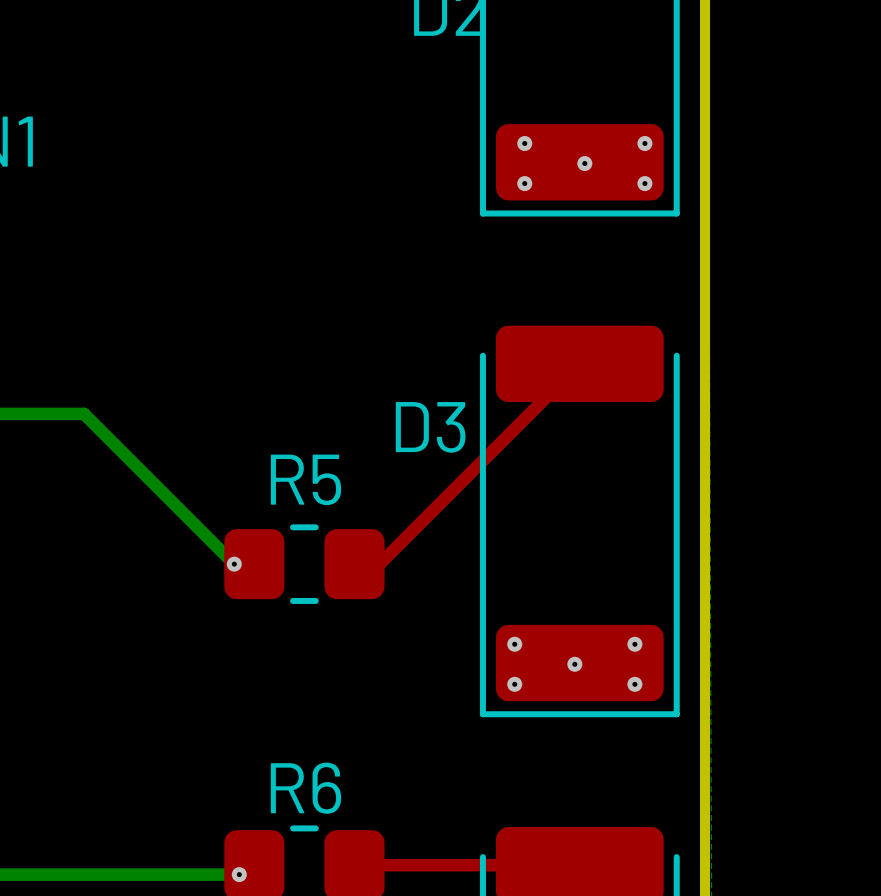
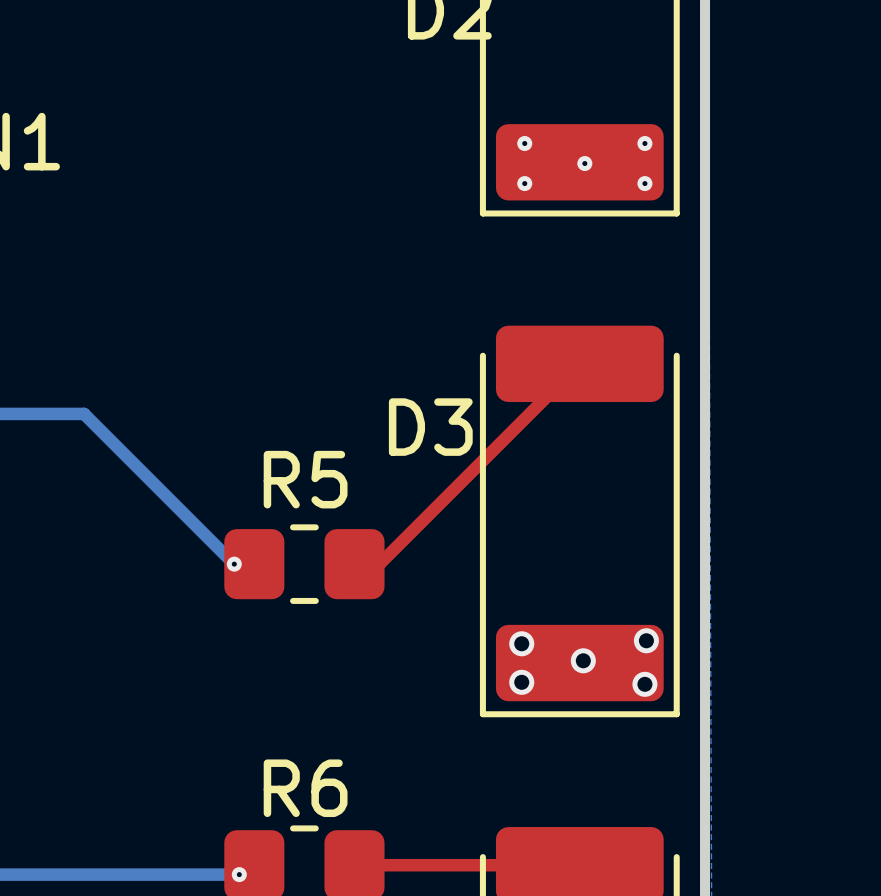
via size: [507, 636, 523, 652] -> [509, 631, 535, 657]
via size: [627, 636, 643, 652] -> [633, 628, 659, 654]
via size: [567, 656, 583, 672] -> [570, 648, 596, 674]
via size: [507, 676, 523, 692] -> [509, 669, 535, 695]
via size: [627, 676, 643, 692] -> [632, 671, 658, 697]

